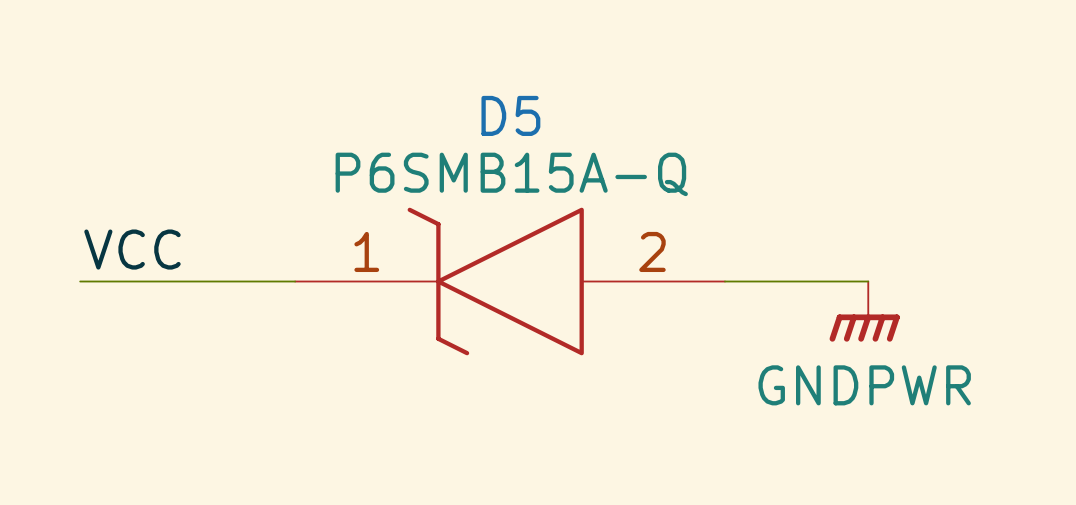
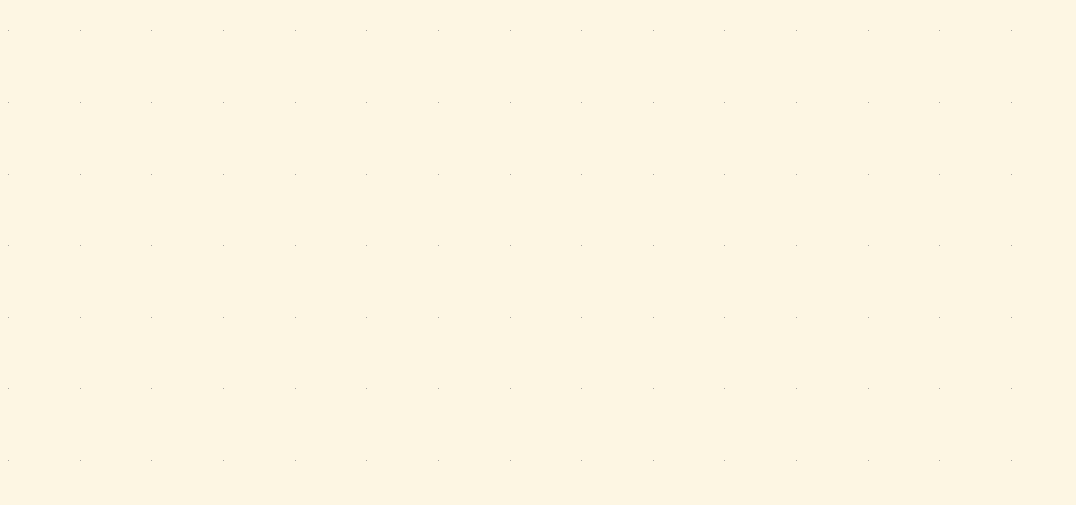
label: VCC (132, 249) -> none
wire: (80, 281) (295, 281) -> none
D5: P6SMB15A-Q (510, 281) -> none
wire: (724, 281) (868, 281) -> none
power symbol: GNDPWR (864, 311) -> none

